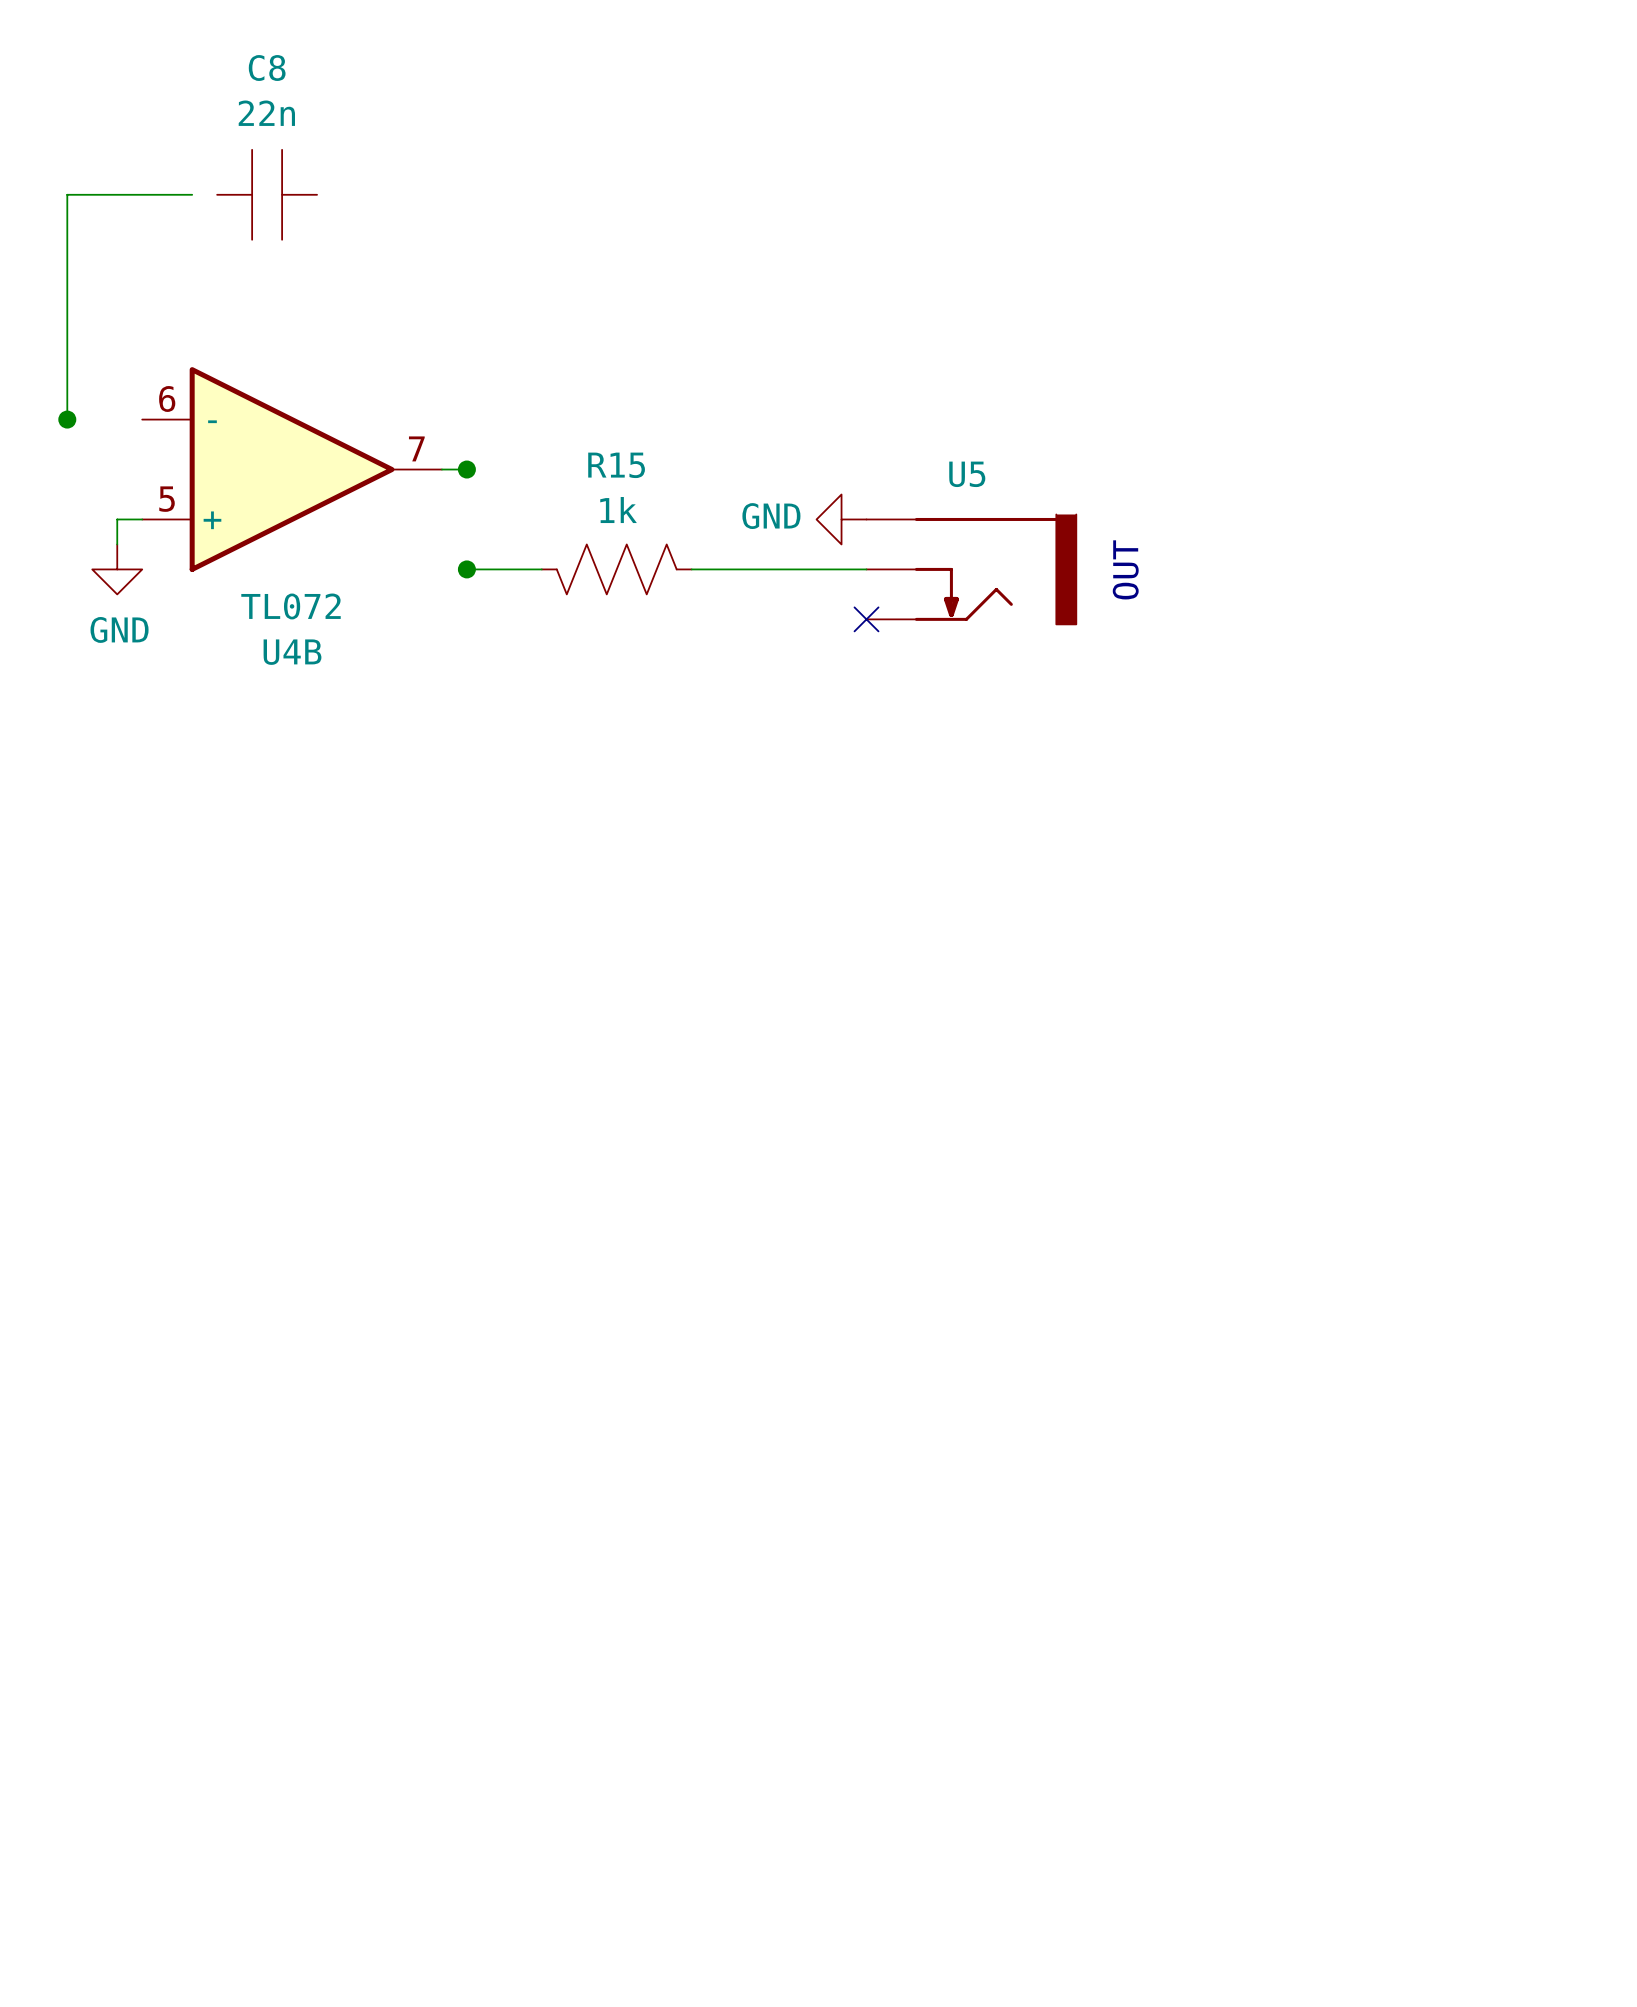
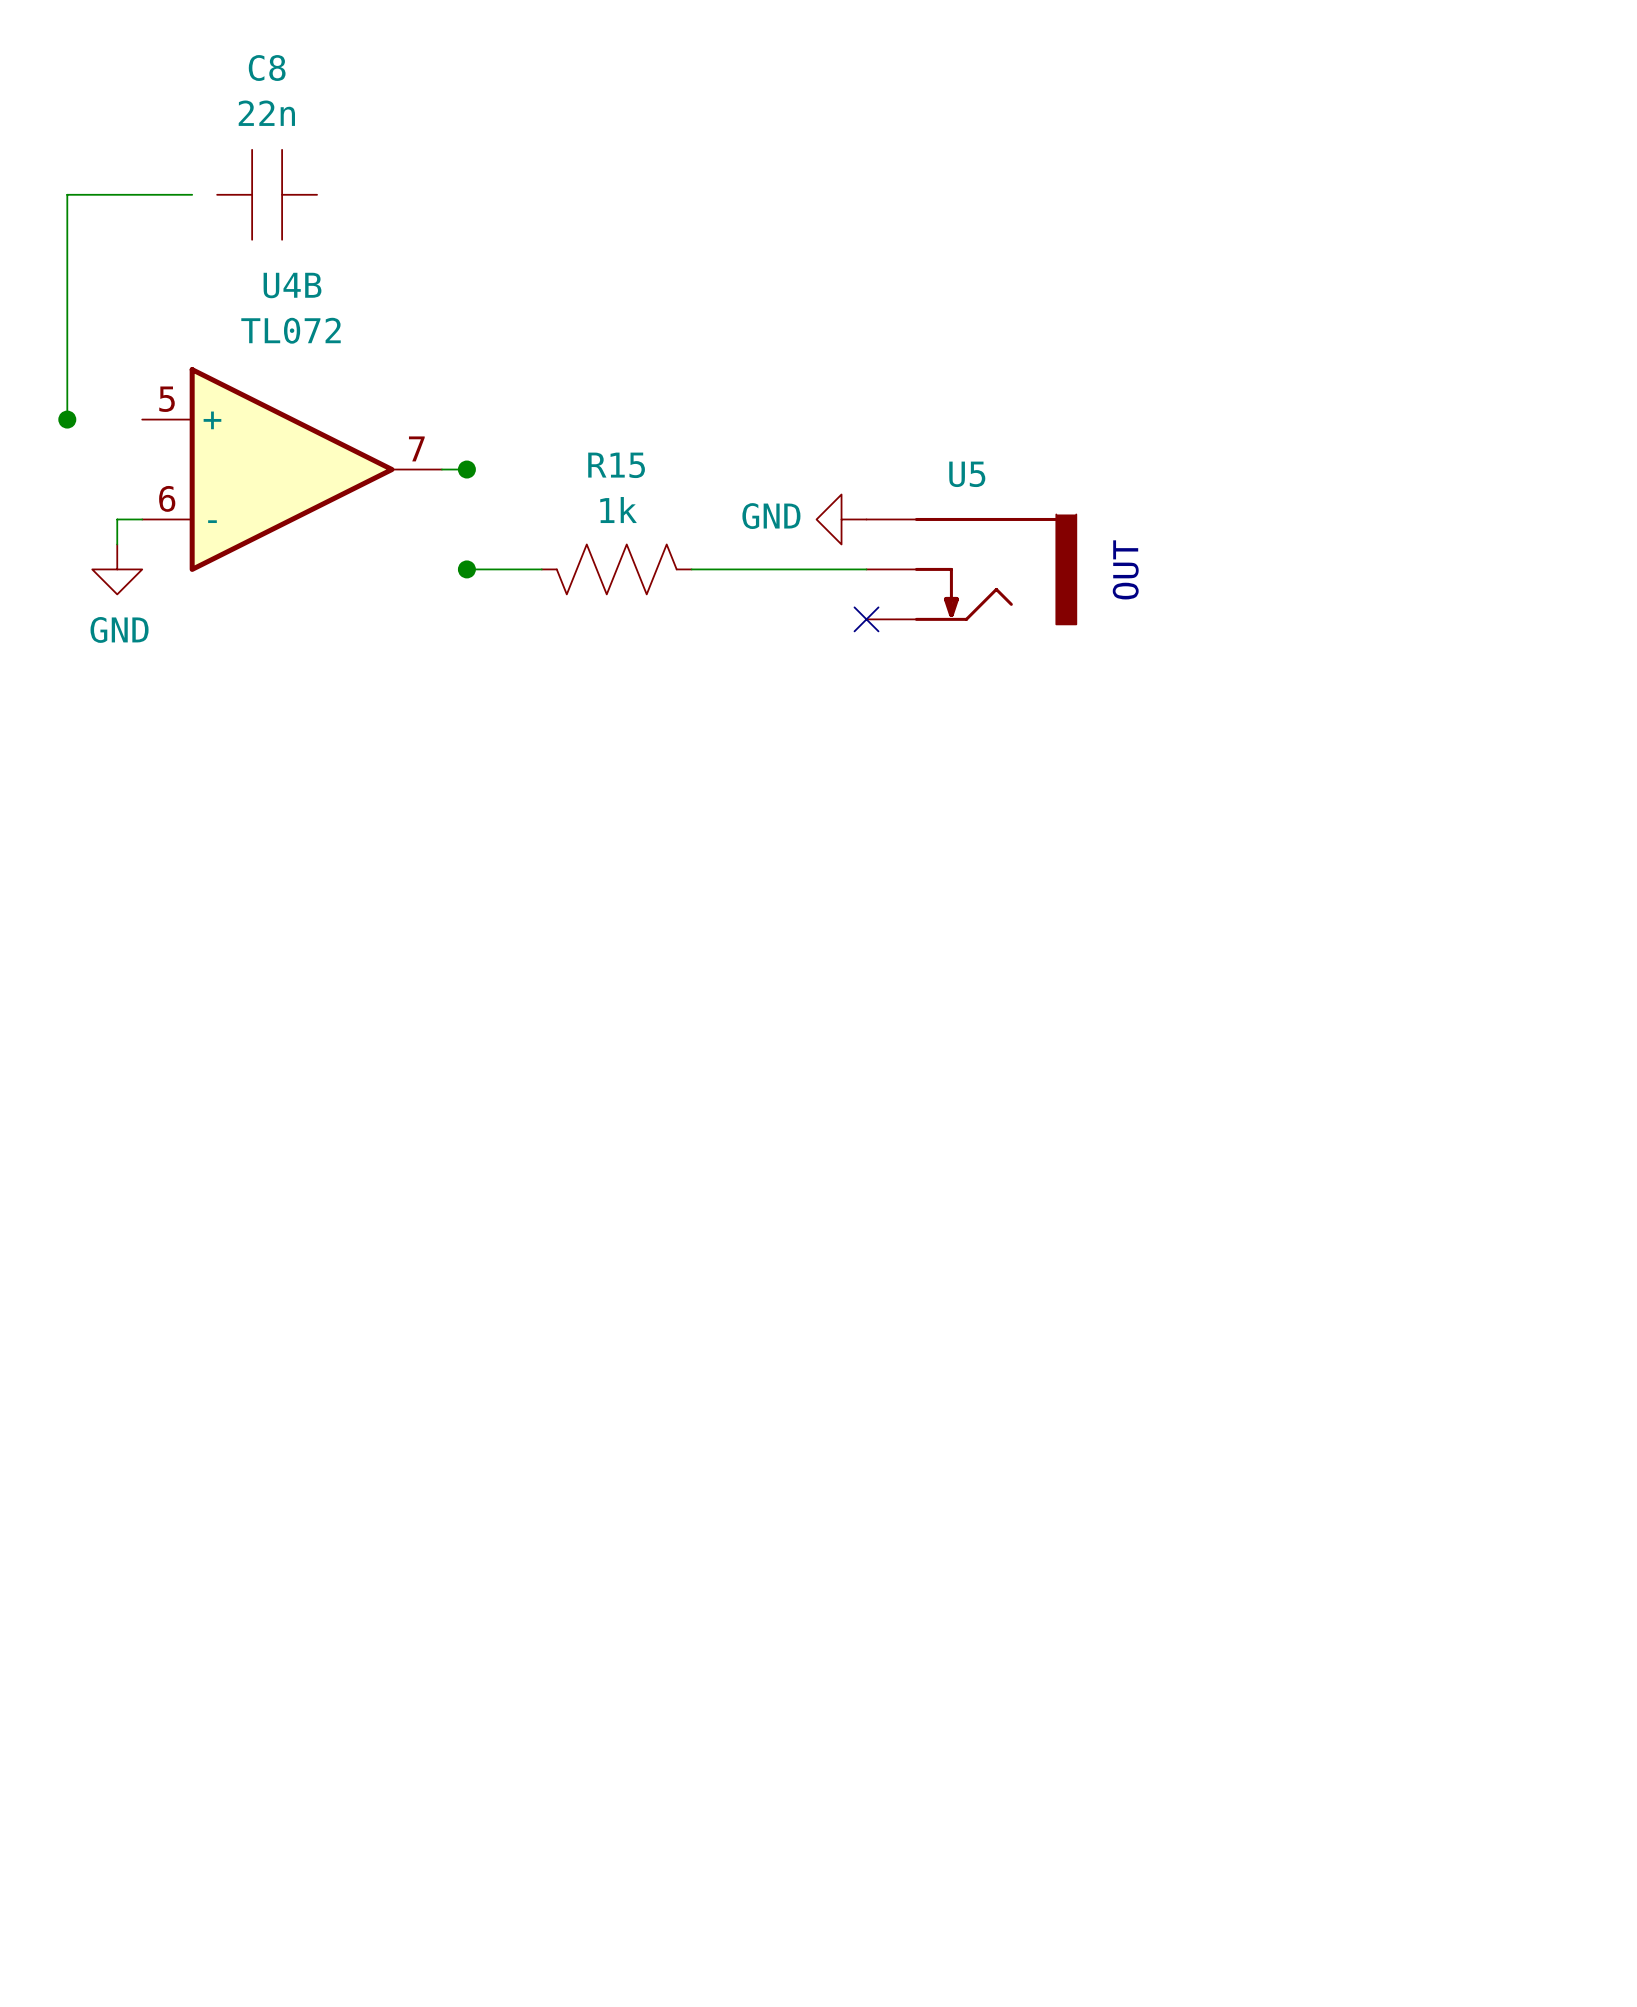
U4B flip: as is (292, 469) -> up-down (292, 469)

